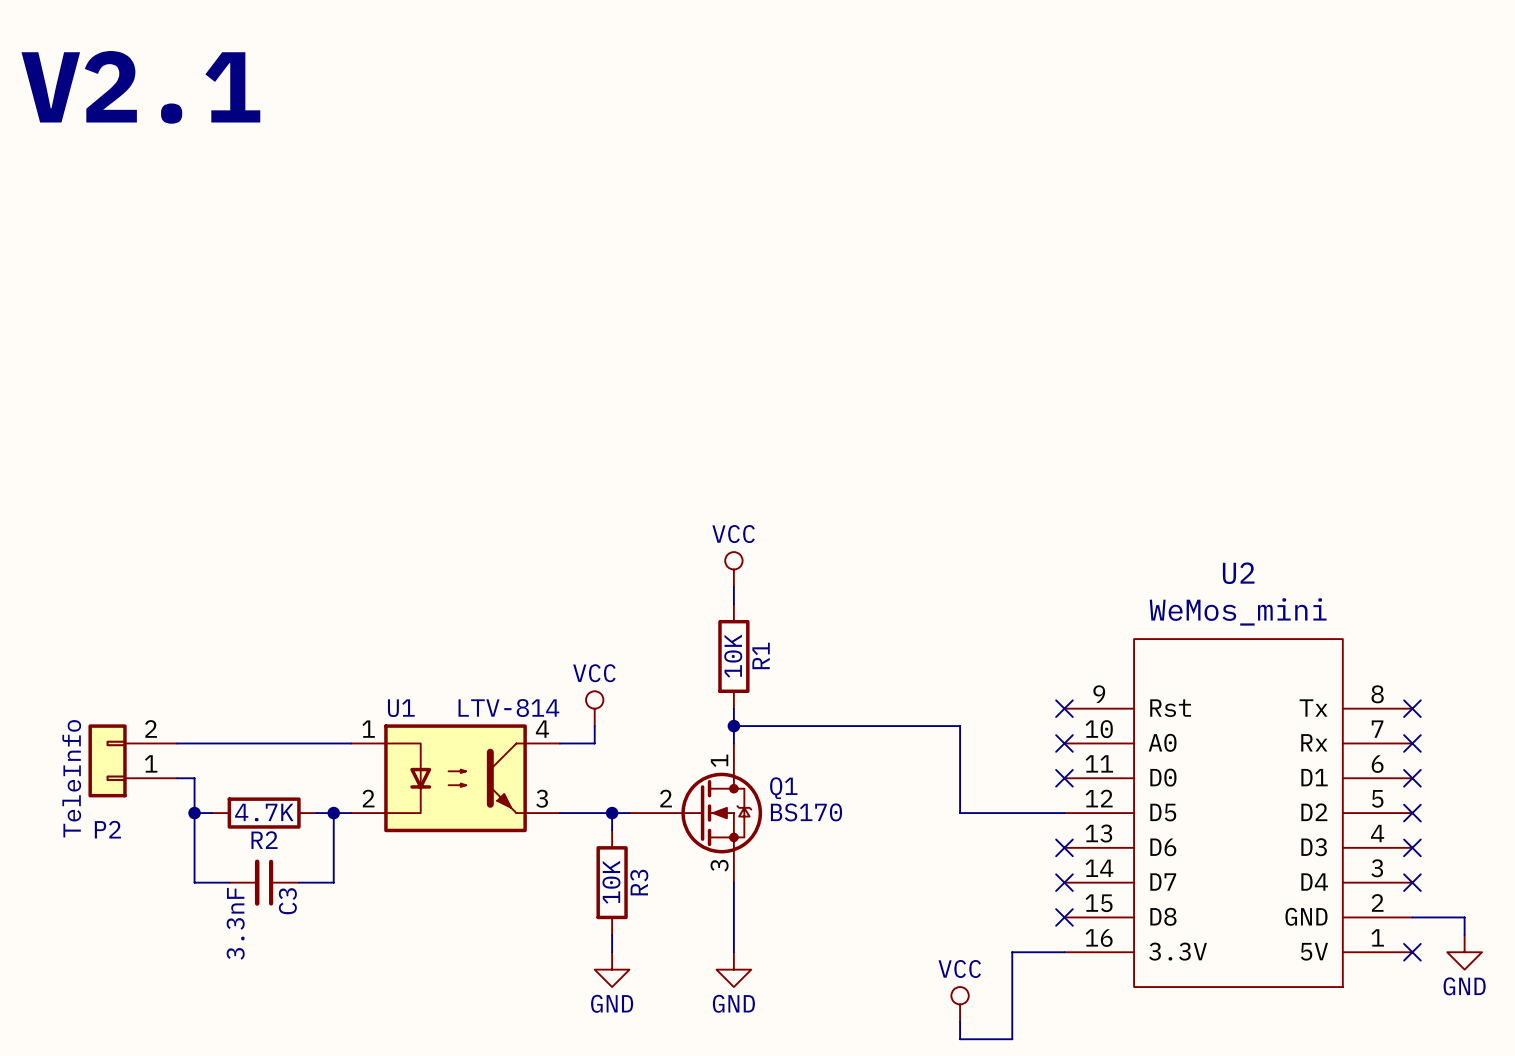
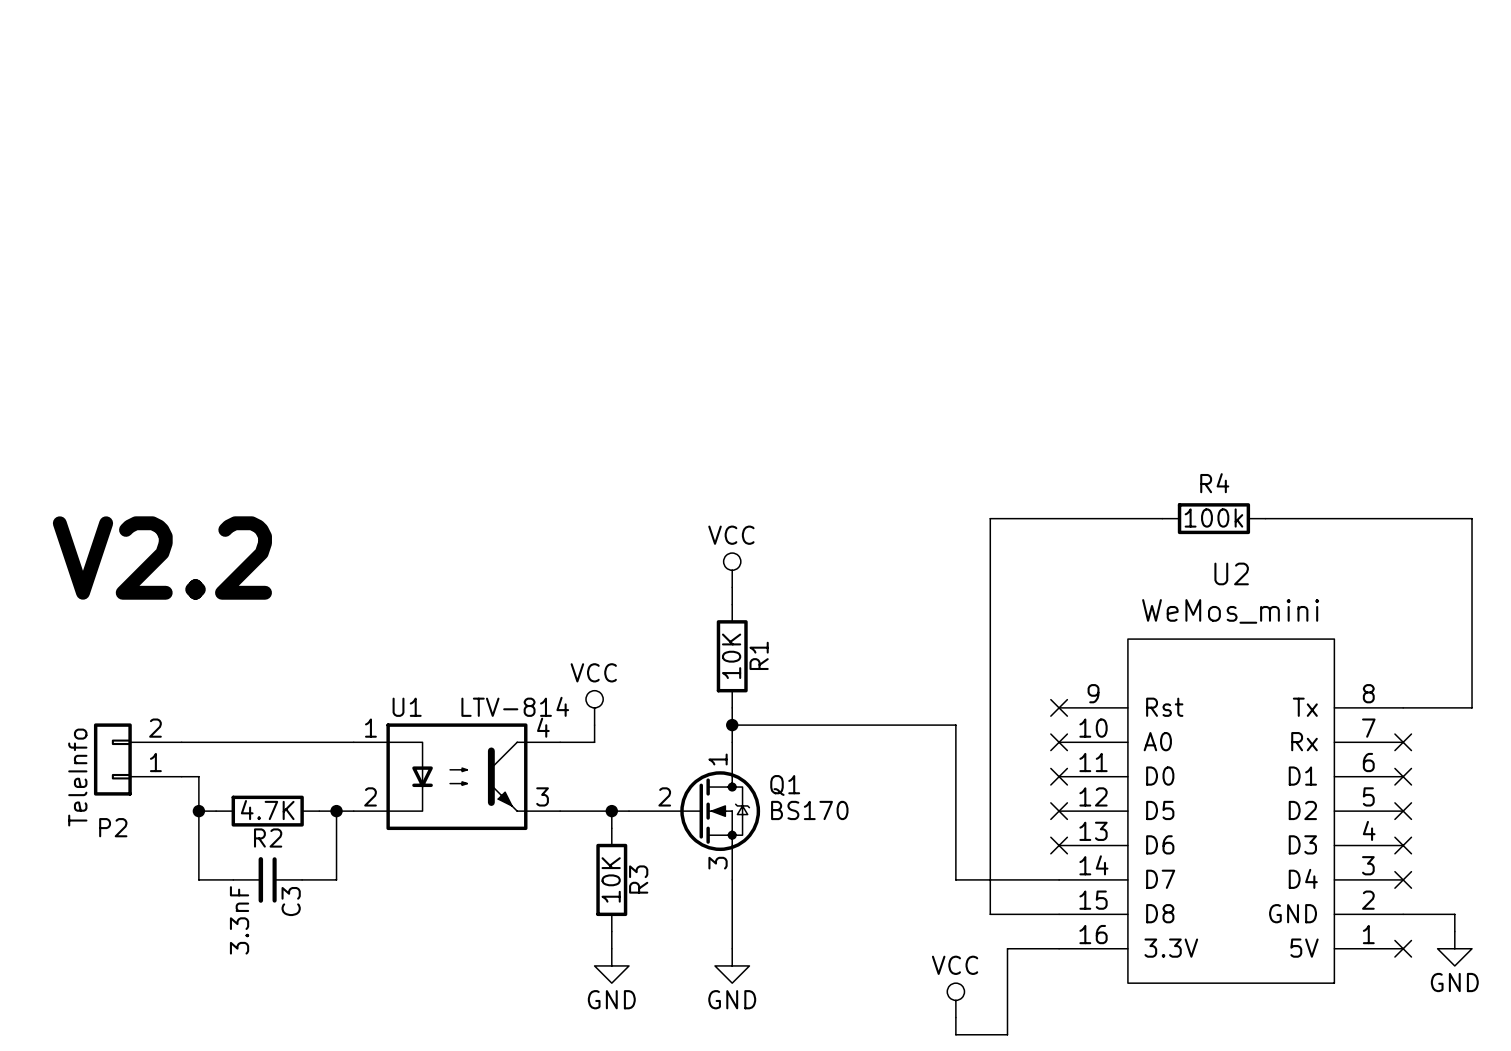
text: V2.1 (140, 87) -> none
wire: none -> (1162, 518) (990, 518) (990, 914) (1059, 914)
R4: none -> 100k (1213, 518)
wire: none -> (1265, 518) (1472, 518) (1472, 707) (1403, 707)
text: none -> V2.2 (162, 558)
no-connect mark: (1412, 708) -> none
wire: (960, 813) (1064, 813) -> (955, 811) (955, 879) (1059, 879)
no-connect mark: none -> (1059, 811)
no-connect mark: (1064, 882) -> none
no-connect mark: (1064, 917) -> none

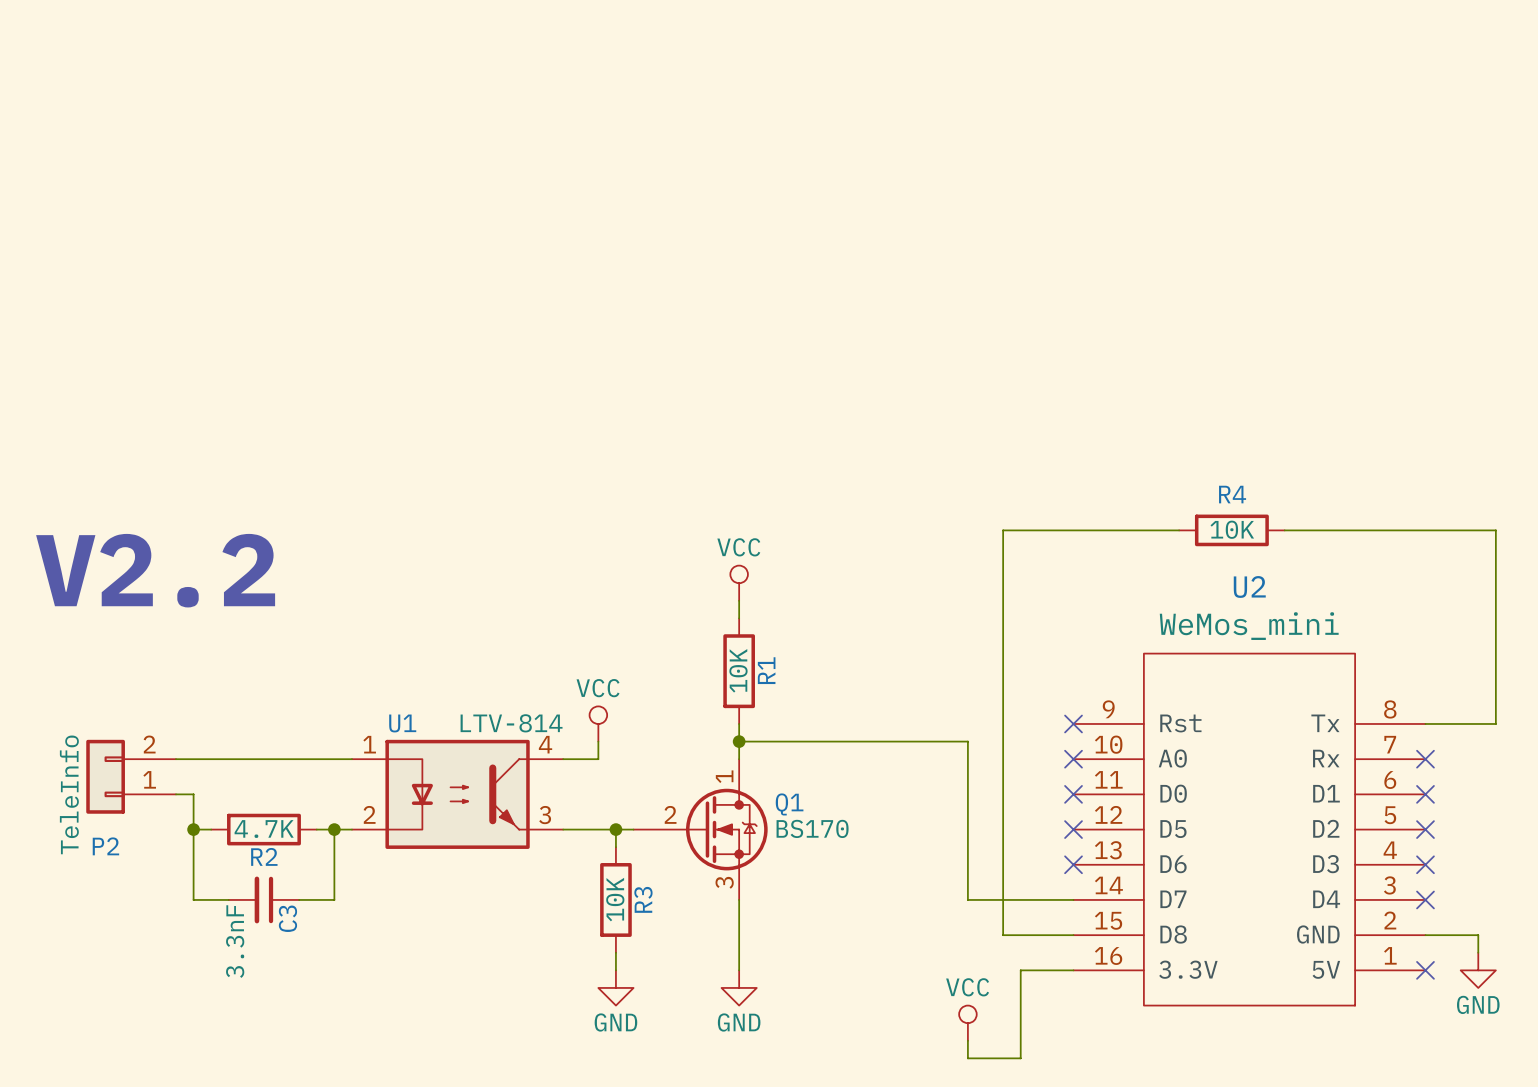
R4 value: 100k (1213, 518) -> 10K (1232, 529)

